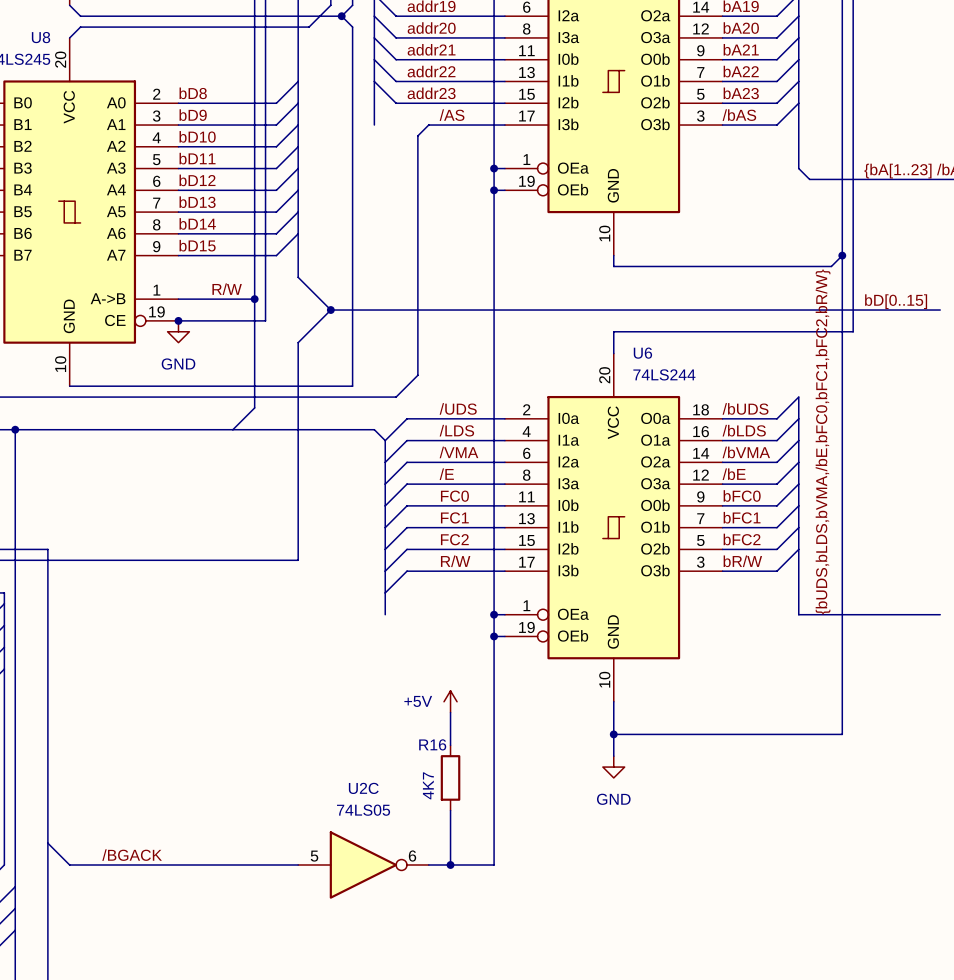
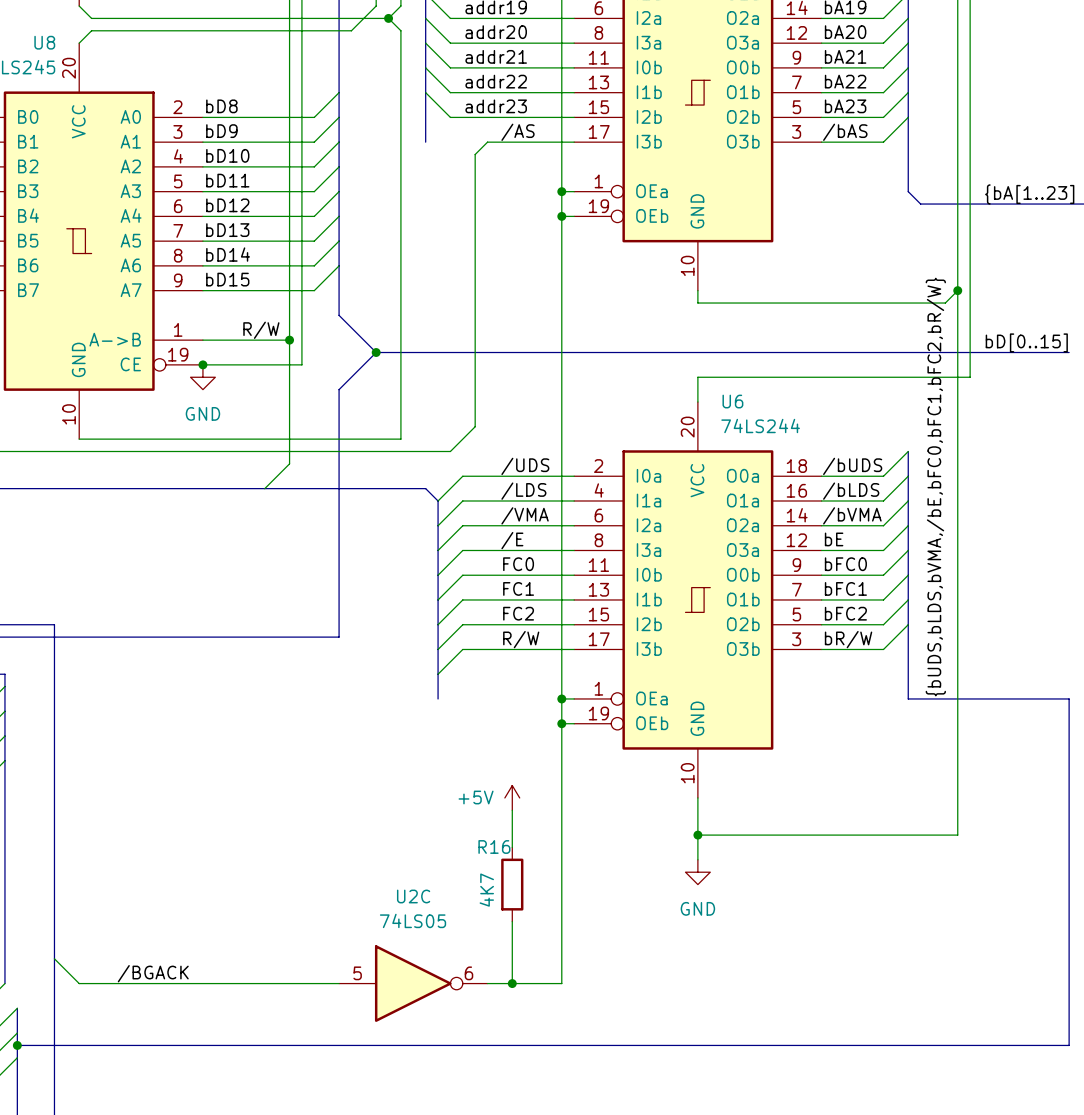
bus: (15, 429) (15, 886) -> none
junction: (15, 429) -> none
label: /bE (734, 474) -> bE (834, 539)
bus: none -> (1069, 698) (1069, 1045) (17, 1045)
junction: none -> (17, 1045)

